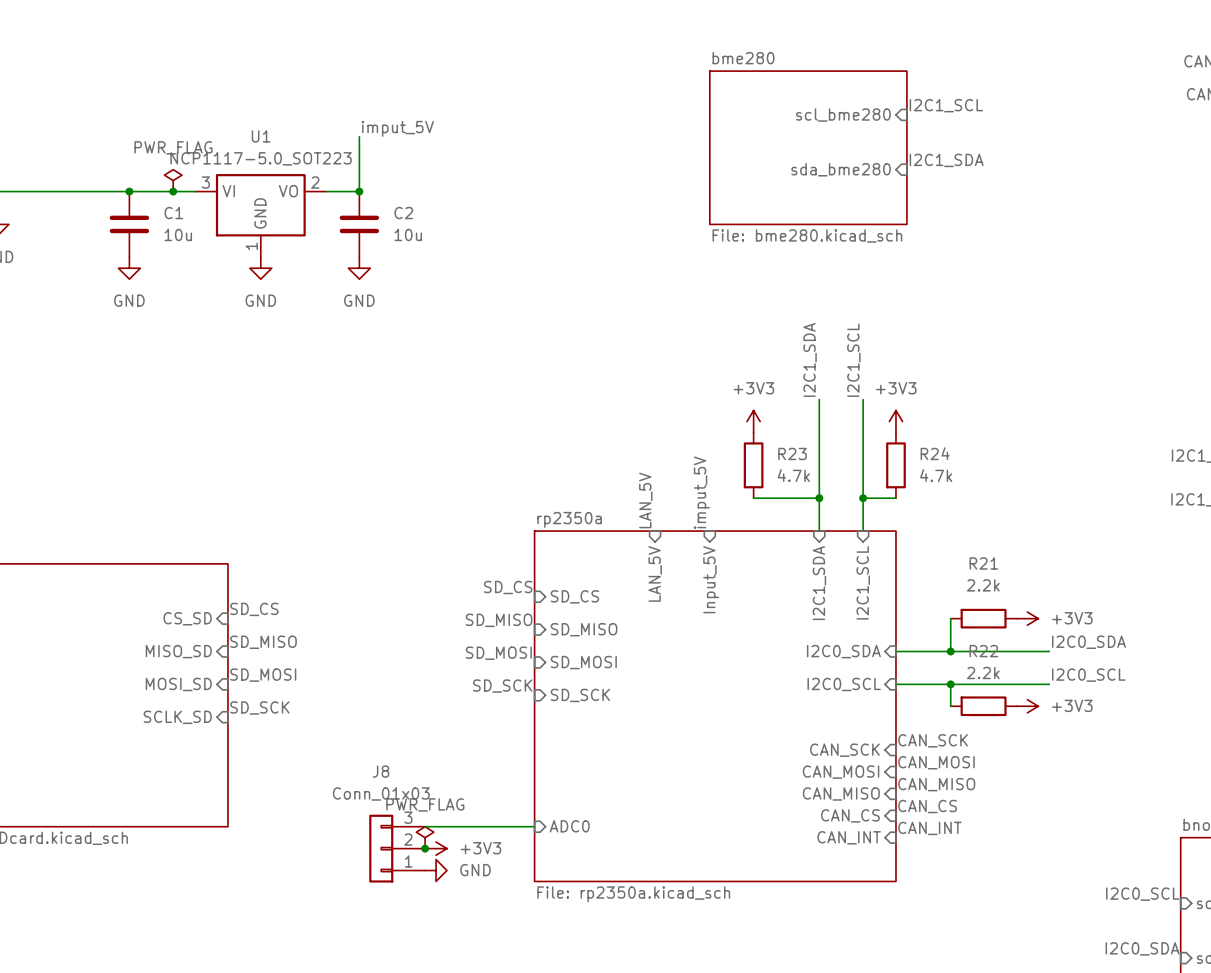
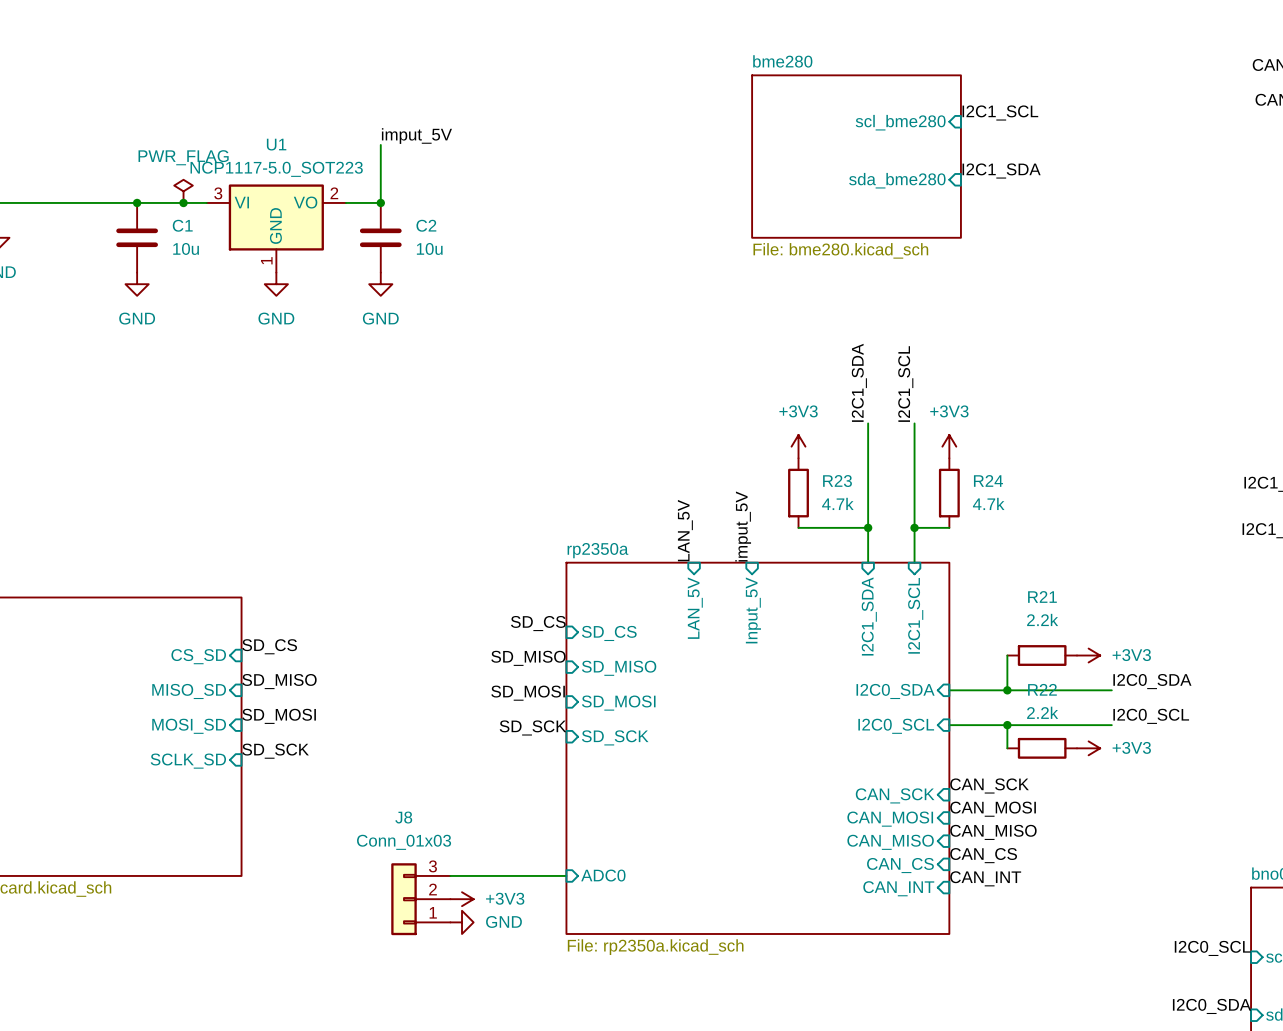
power symbol: PWR_FLAG (425, 837) -> none
junction: (425, 848) -> none

